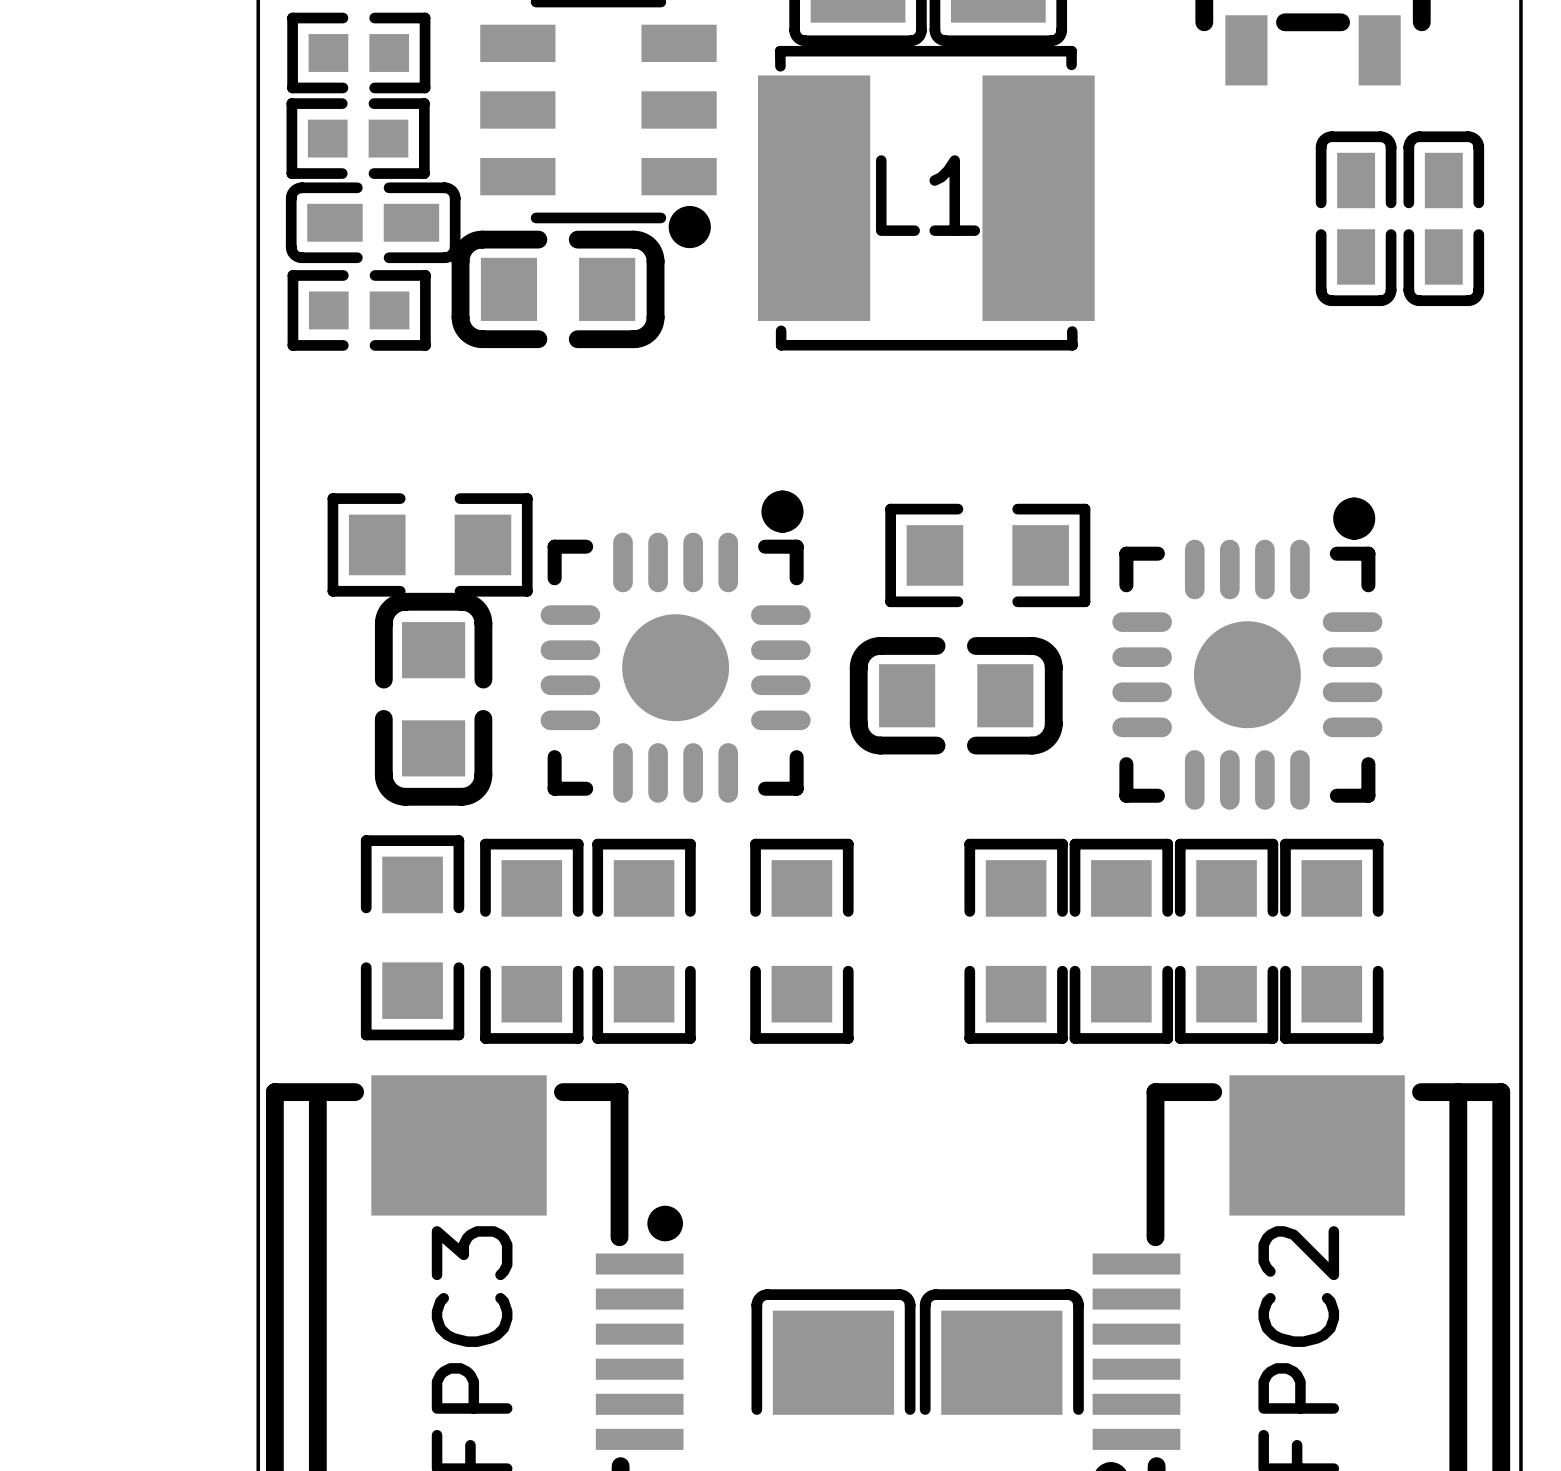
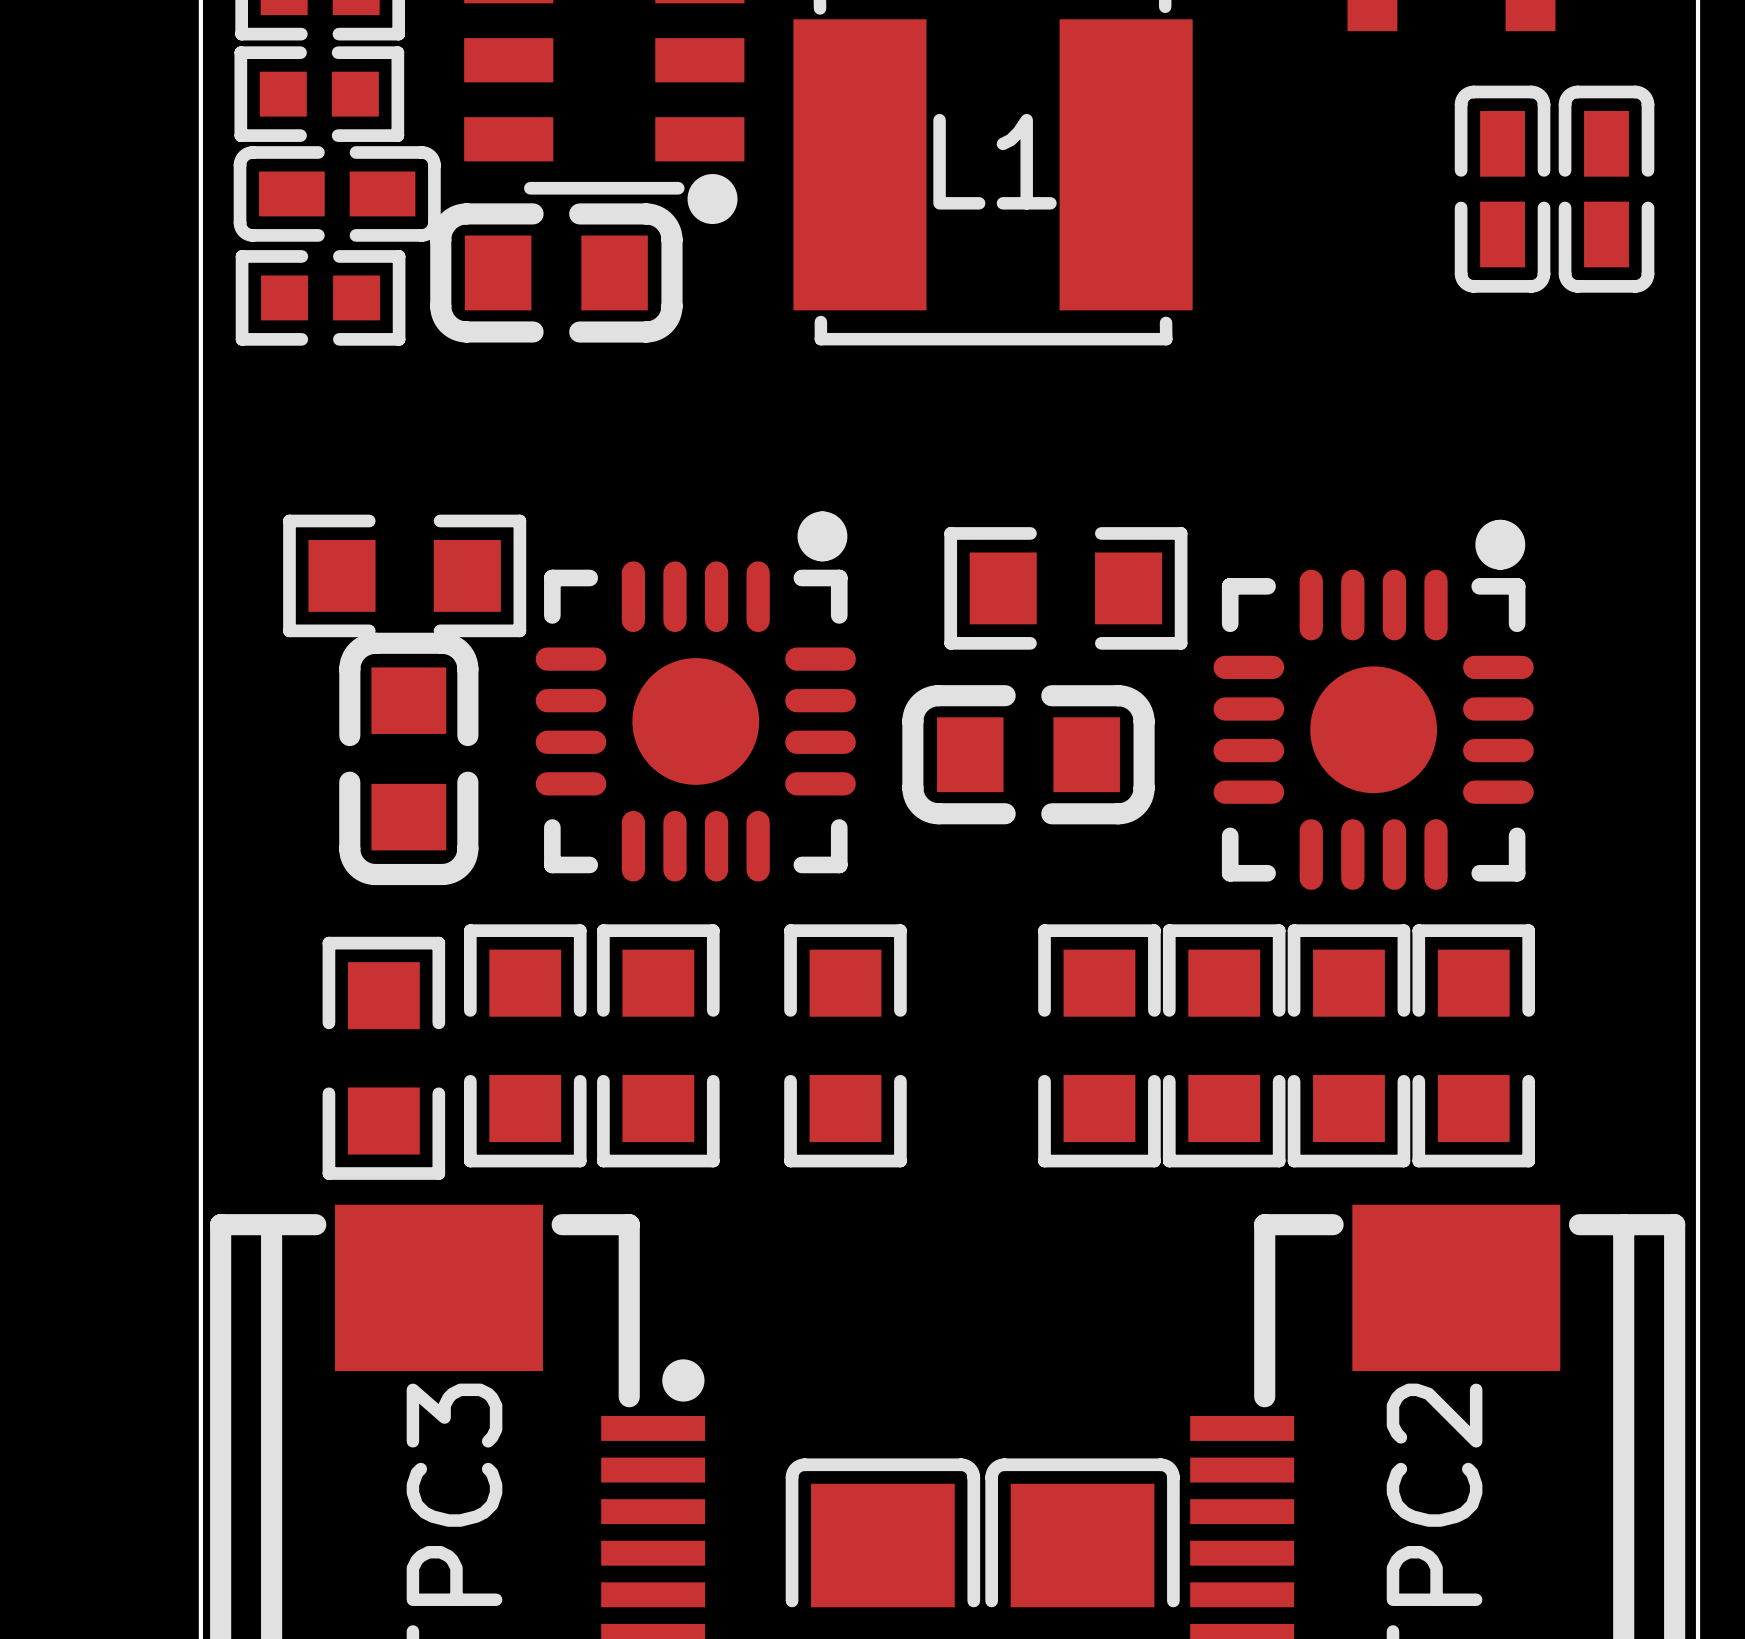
part position: (412, 937) -> (383, 1058)

